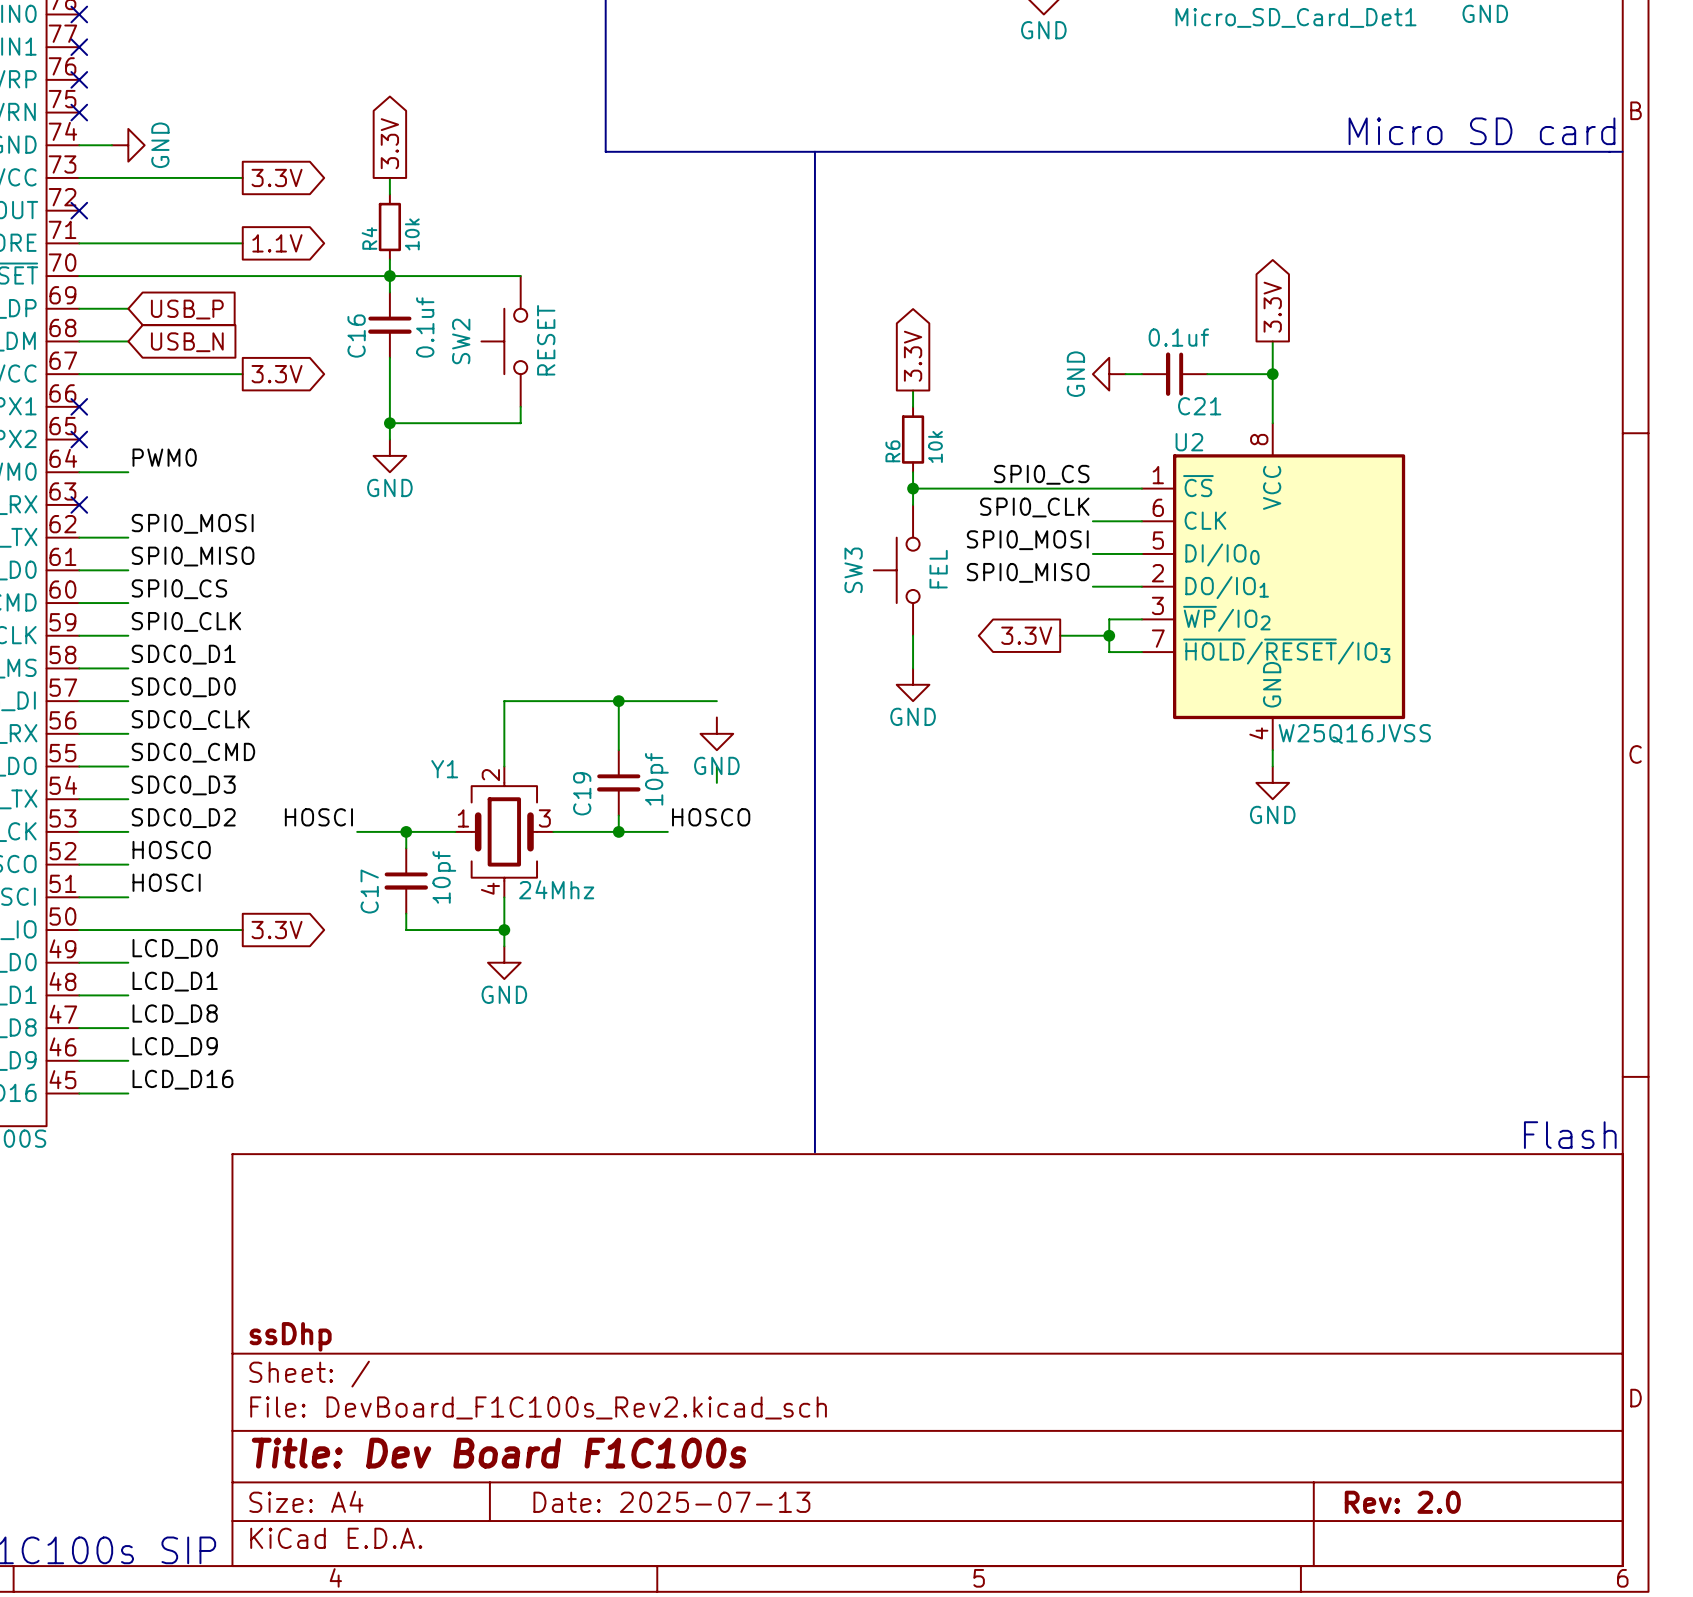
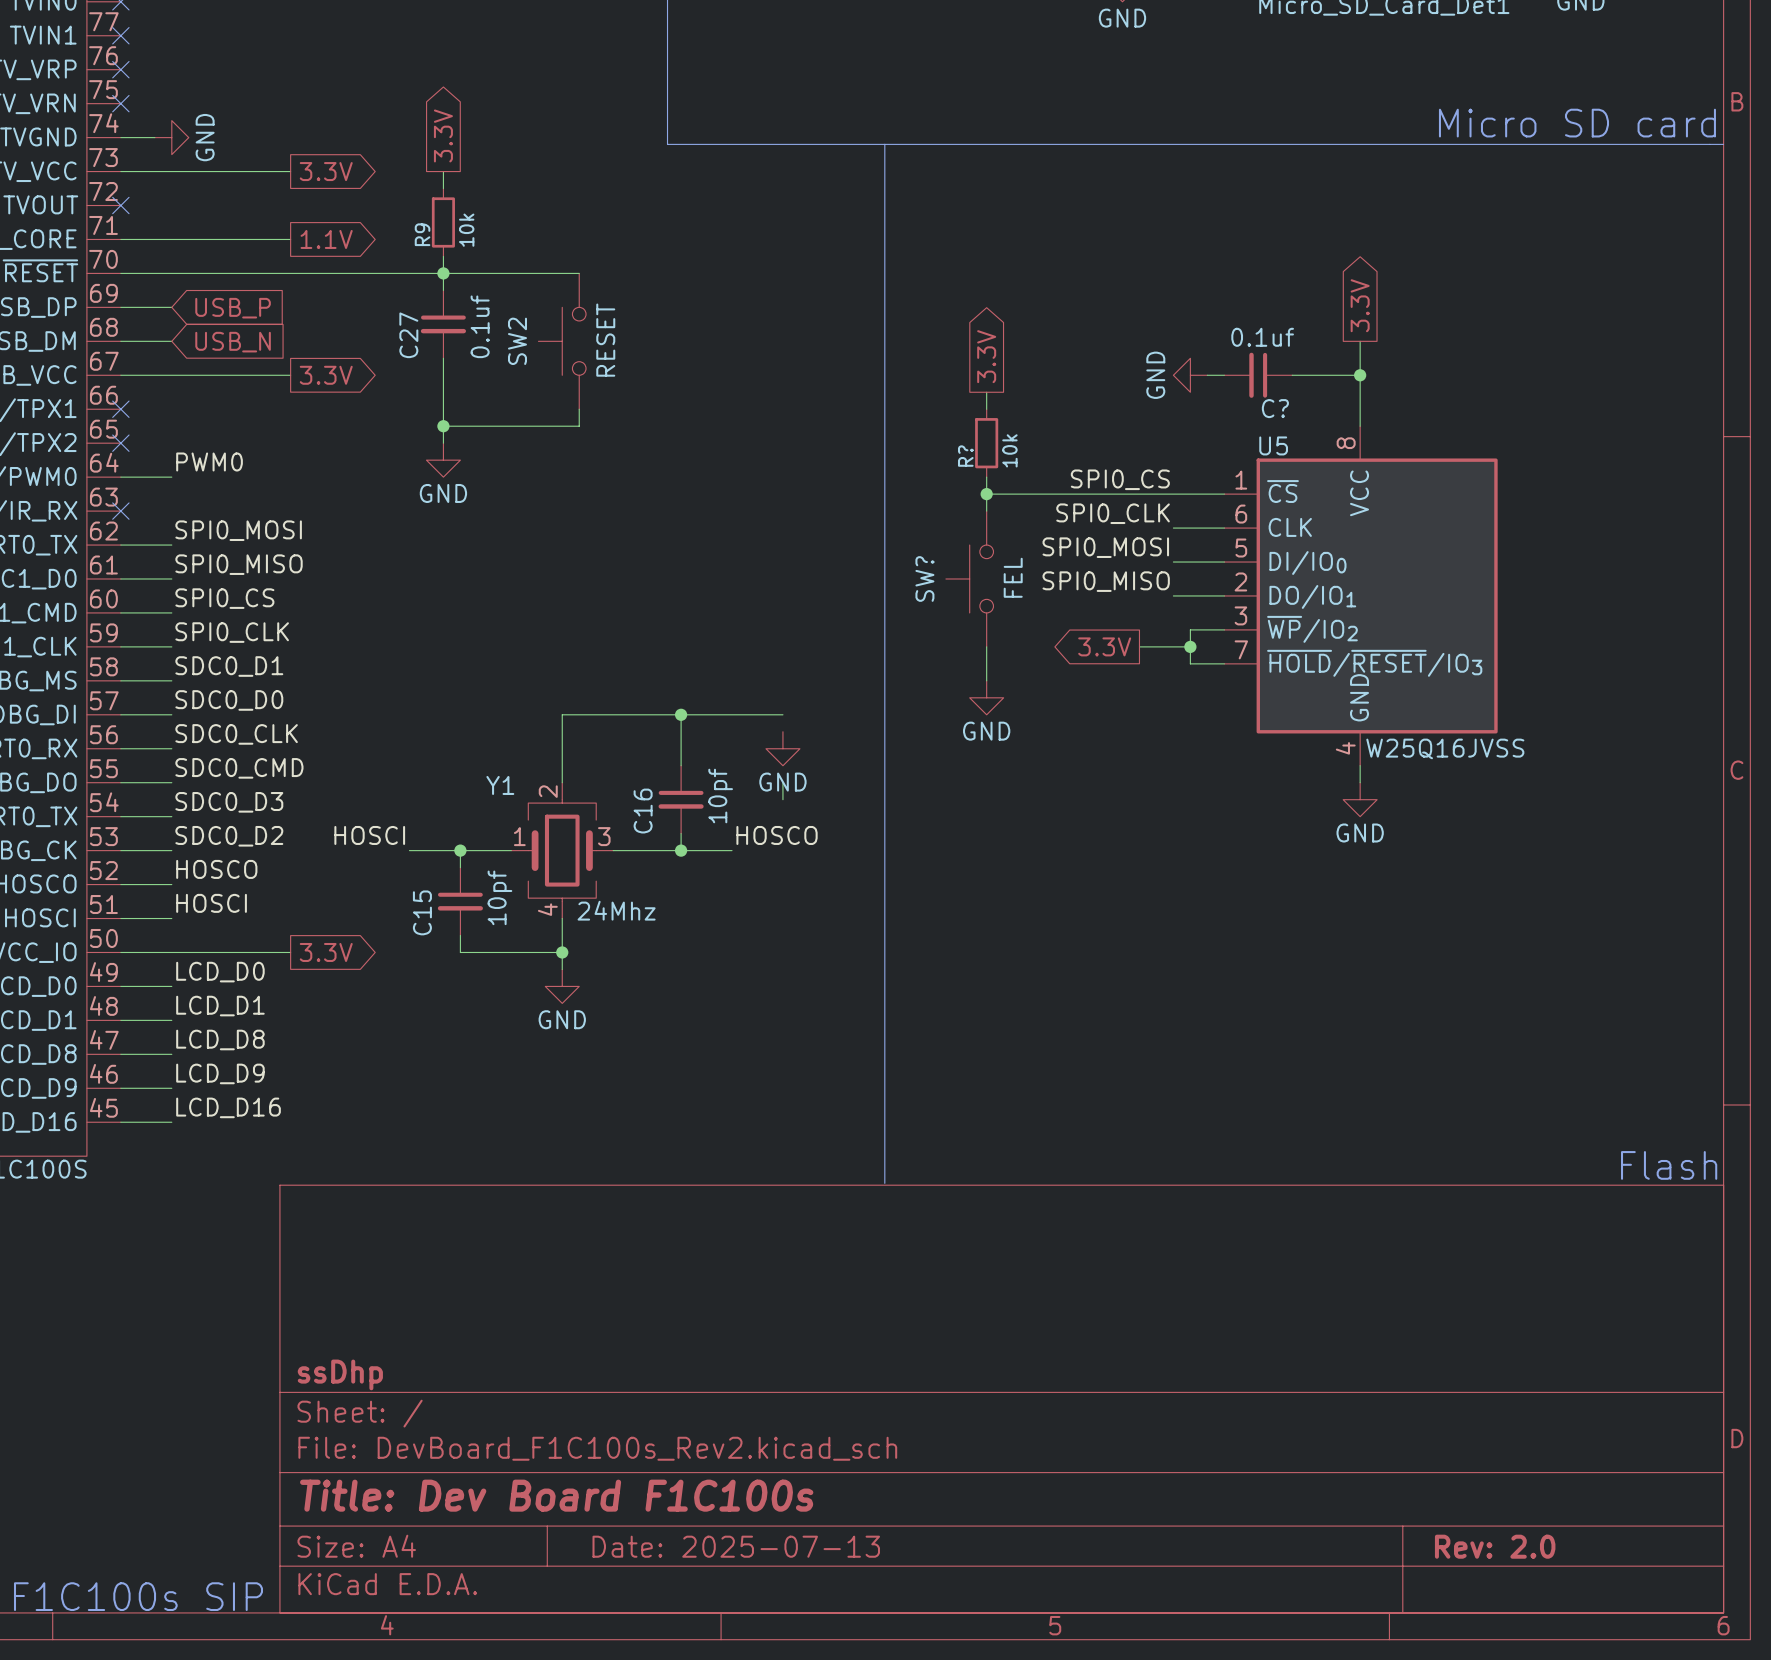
R4 name: R4 (369, 238) -> R9 (422, 234)
C16 name: C16 (356, 336) -> C27 (408, 335)
C21 name: C21 (1199, 406) -> C? (1275, 408)
U2 name: U2 (1189, 442) -> U5 (1273, 445)
R6 name: R6 (892, 451) -> R? (965, 456)
SW3 name: SW3 (853, 570) -> SW? (924, 578)
C19 name: C19 (582, 793) -> C16 (643, 811)
C17 name: C17 (369, 891) -> C15 (422, 912)

